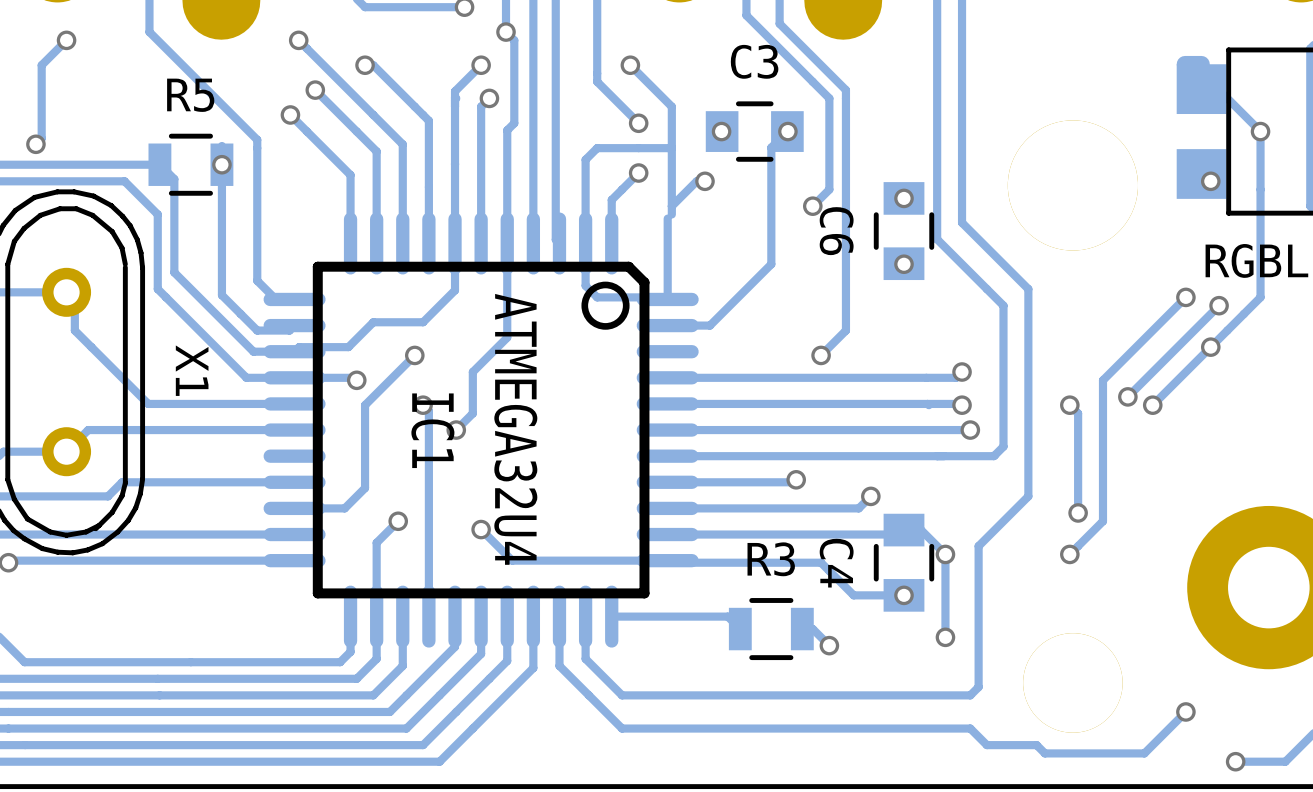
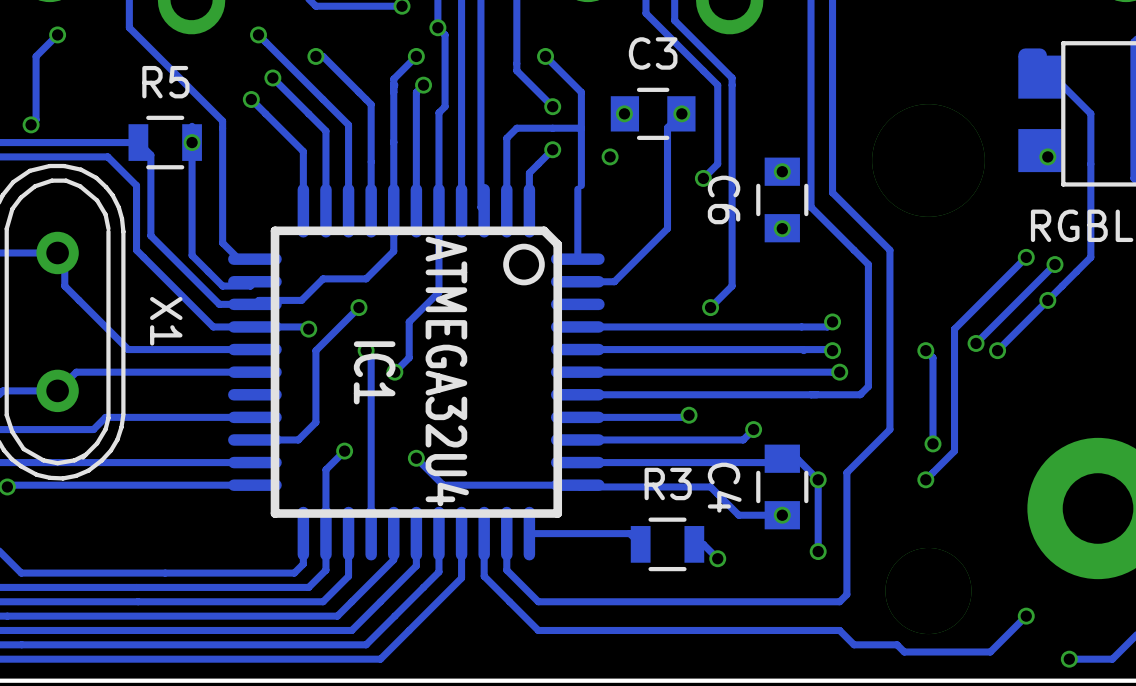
via: (1260, 131) -> none
track: (705, 181) (696, 181) (671, 206) -> none
track: (585, 243) (585, 285) (597, 297) (665, 297) (667, 299) -> none

